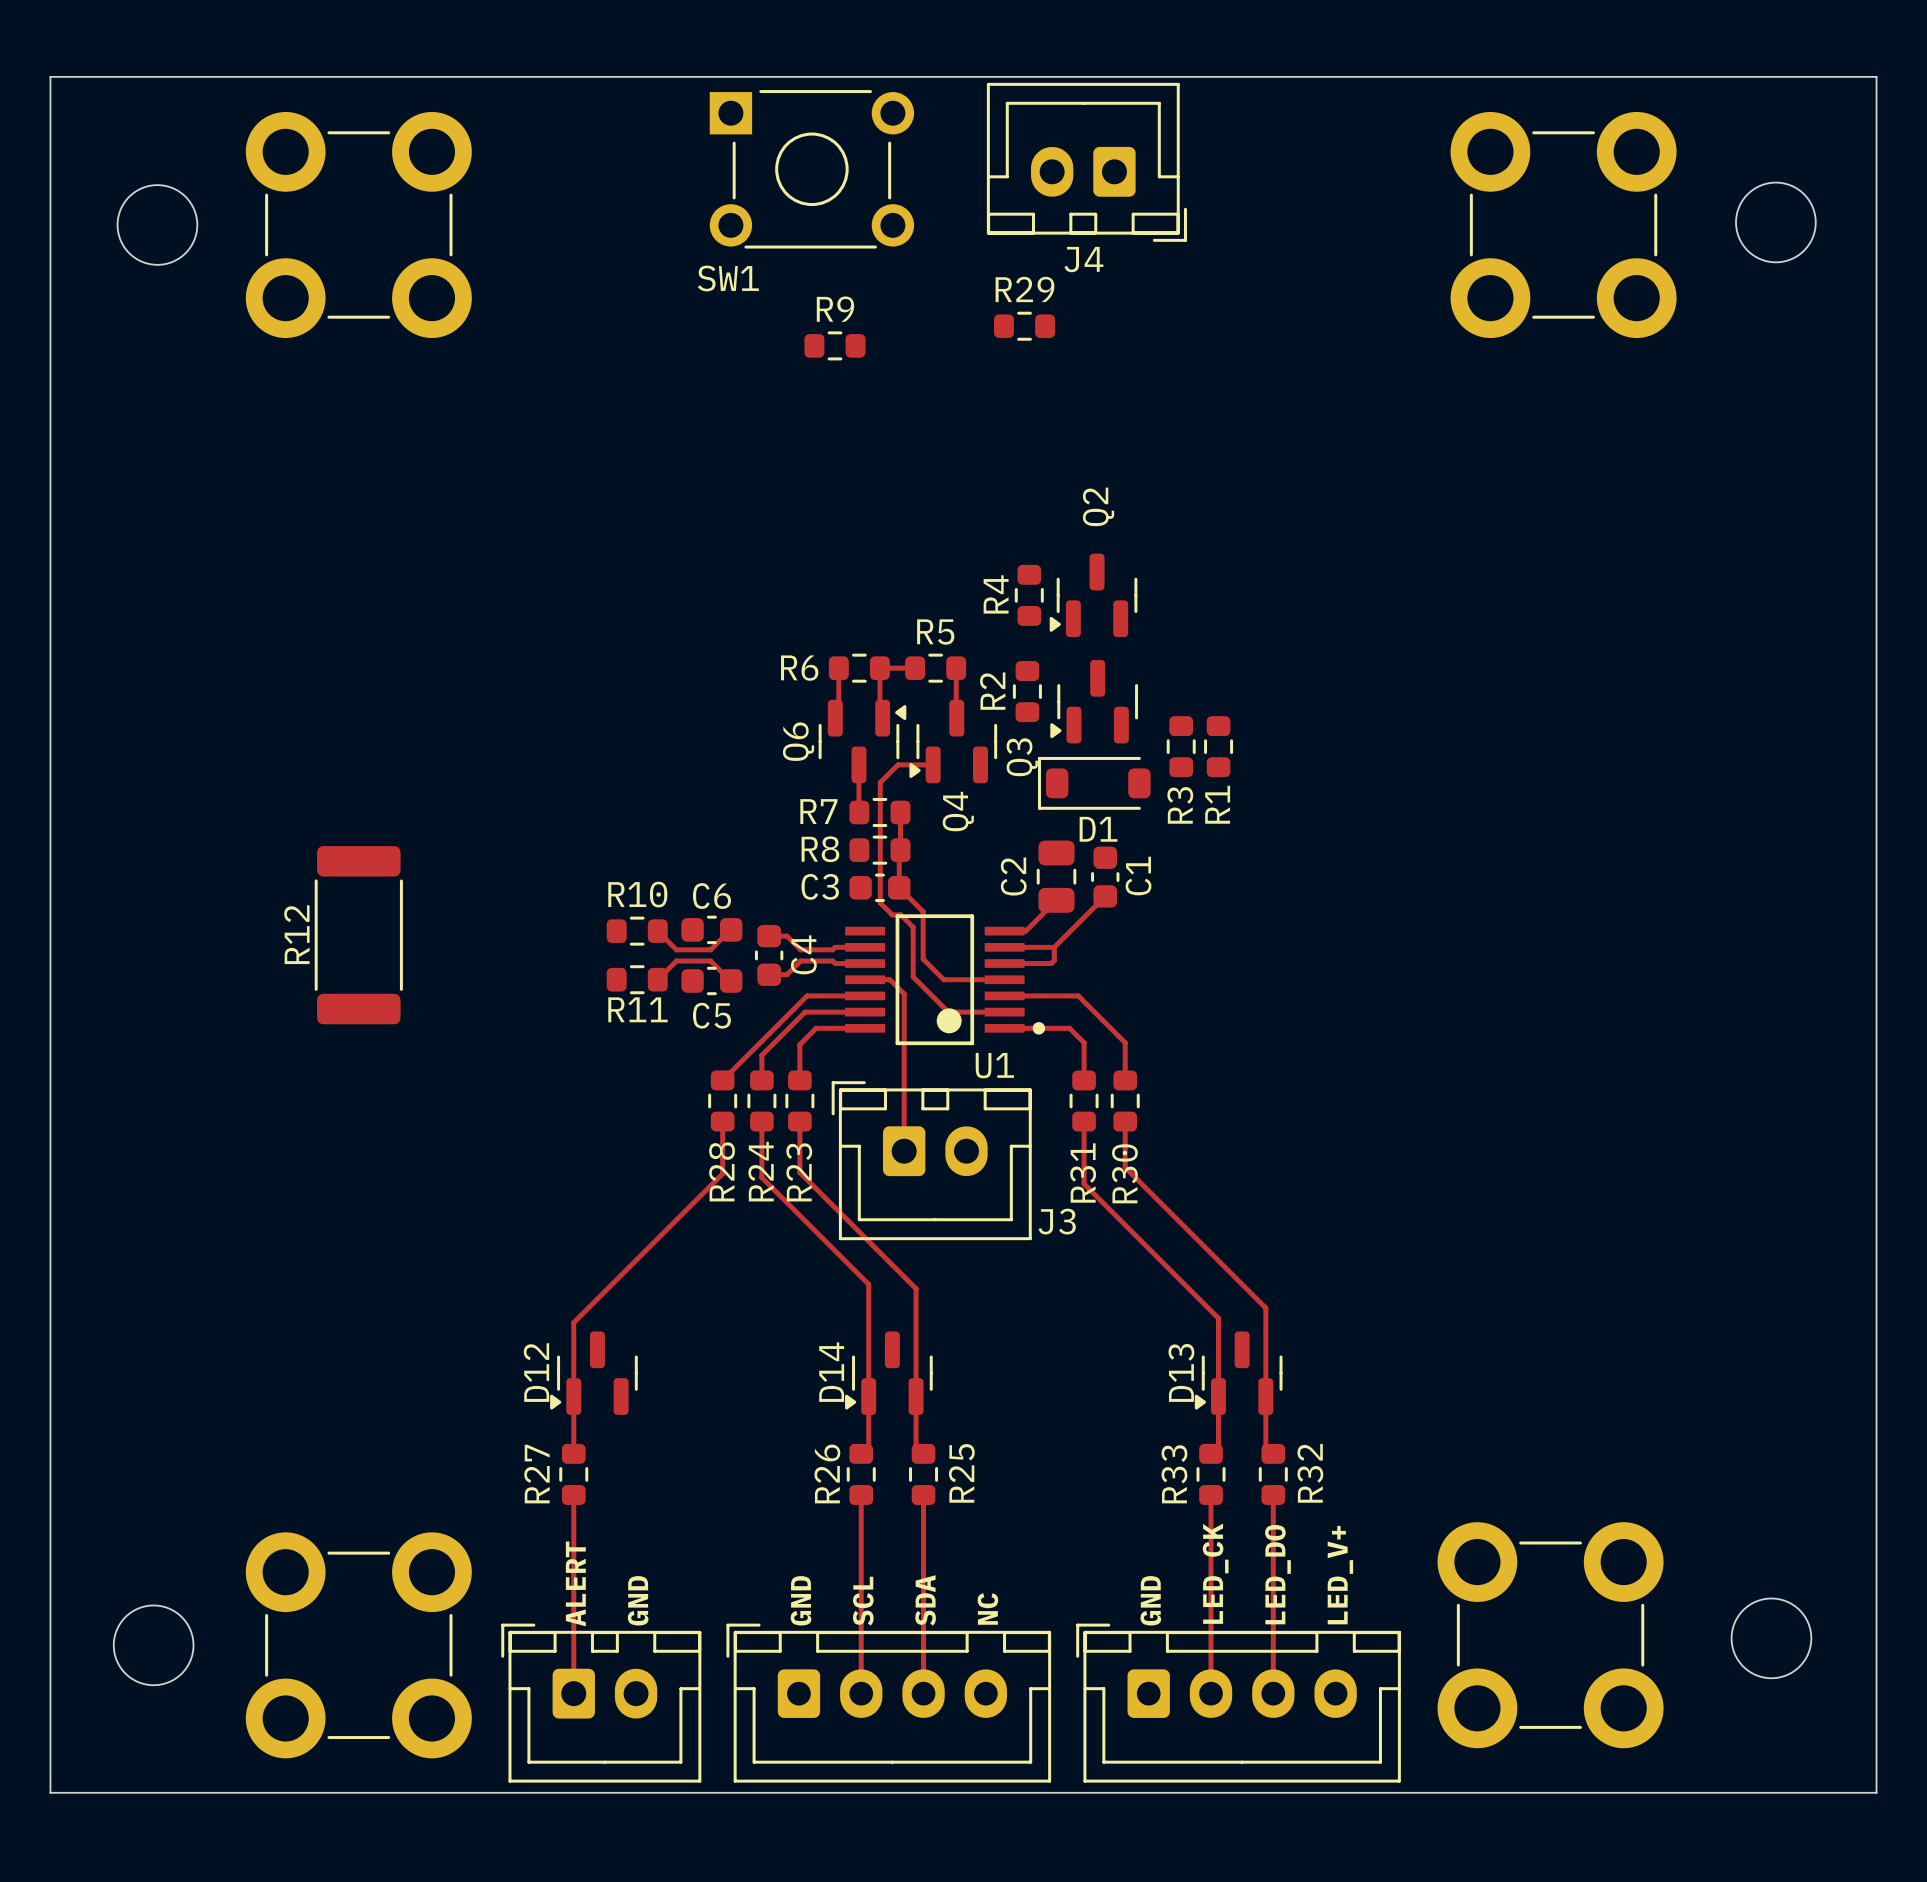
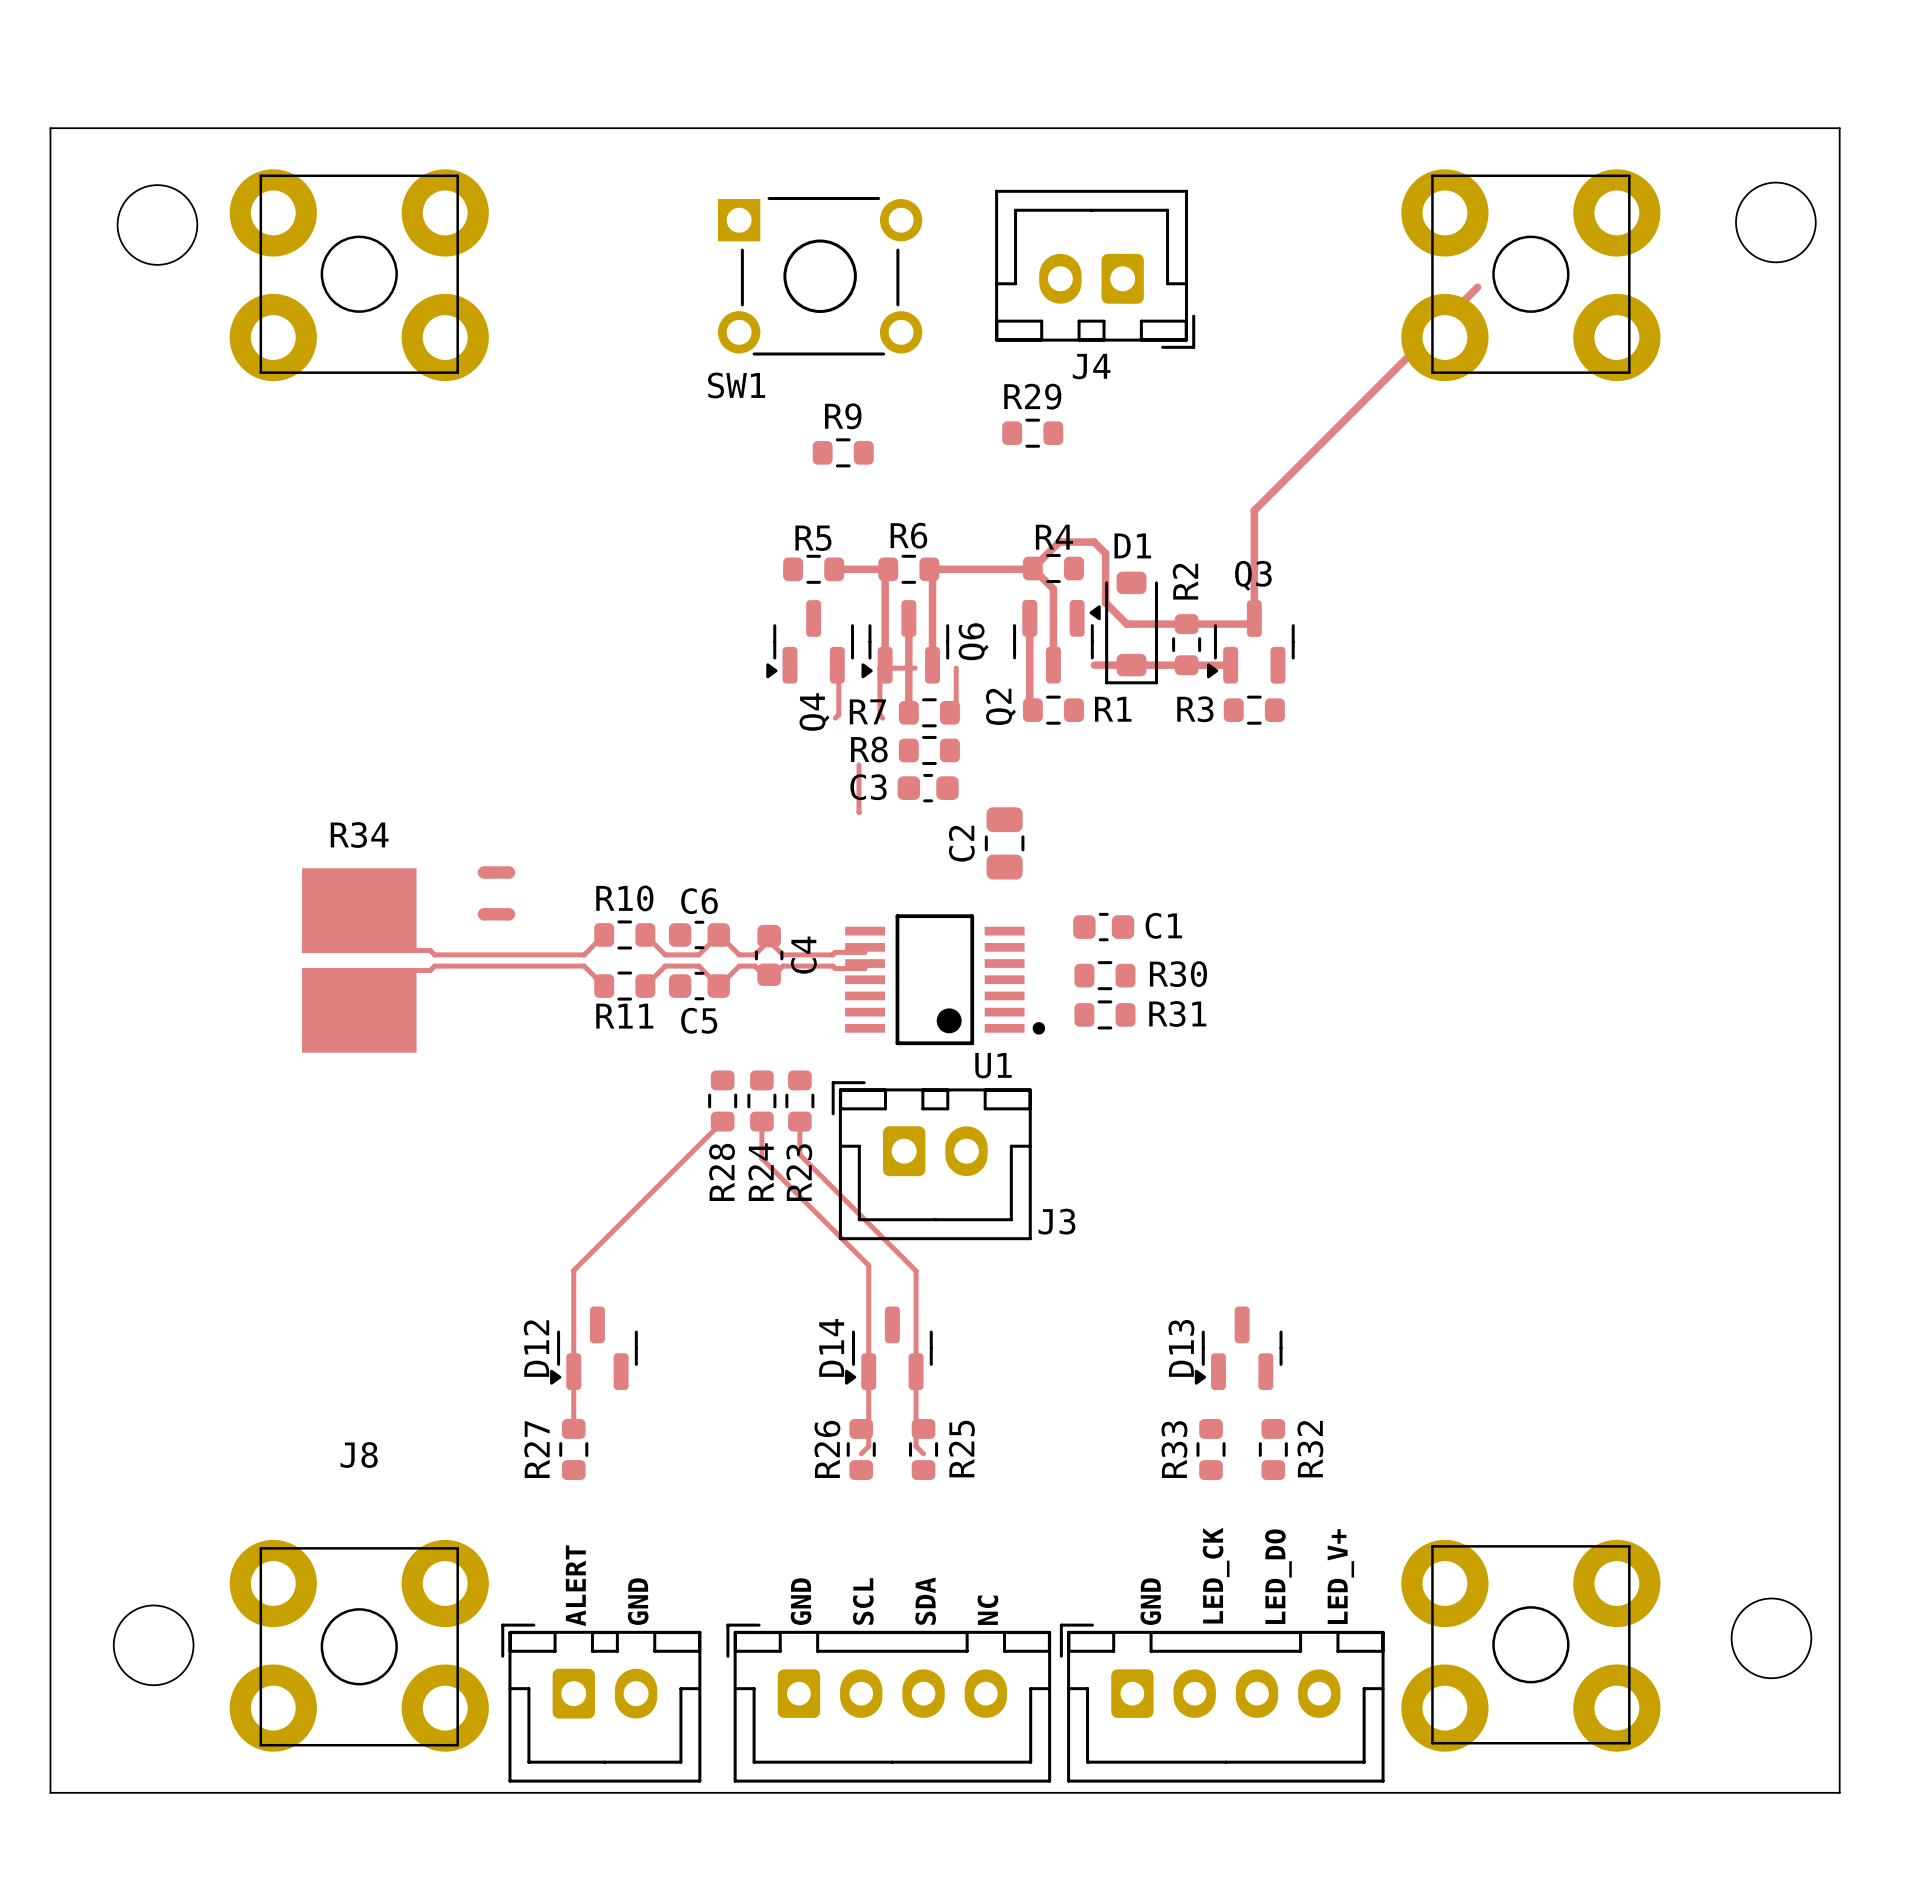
board edge: (50, 128) (50, 76) (1876, 76) (1876, 1792) (1839, 1792) -> (50, 128) (1839, 128) (1839, 1792)
J4 position: (1086, 162) -> (1095, 269)
SW1 position: (811, 169) -> (820, 276)
part: (358, 224) -> none
part: (1563, 224) -> none
part: none -> (359, 275)
part: none -> (1530, 275)
top track: none -> (1477, 287) (1254, 510) (1254, 618) (1248, 624) (1126, 624) (1105, 602) (1105, 553) (1094, 542) (1059, 542) (1032, 569) (929, 569) (932, 572) (932, 665)
R29 position: (1024, 326) -> (1032, 433)
R9 position: (835, 345) -> (843, 452)
Q2 name position: Q2 (1098, 506) -> Q2 (1000, 706)
top track: none -> (1032, 568) (1053, 589) (1053, 665)
top track: none -> (834, 569) (888, 569) (885, 572) (885, 665)
R4 rotation: 0° (1029, 595) -> 90° clockwise (1053, 568)
Q2 rotation: 0° (1093, 595) -> 180° (1056, 641)
Q2 position: (1093, 595) -> (1056, 641)
top track: none -> (908, 618) (908, 712)
top track: none -> (1029, 618) (1029, 707) (1032, 710)
R5 name position: R5 (935, 632) -> R5 (813, 538)
top track: none -> (1094, 665) (1230, 665)
R6 name position: R6 (799, 668) -> R6 (908, 535)
R6 position: (859, 668) -> (908, 569)
R5 position: (935, 668) -> (813, 569)
R2 name position: R2 (992, 691) -> R2 (1185, 581)
R2 position: (1027, 691) -> (1186, 644)
Q3 position: (1094, 701) -> (1250, 641)
Q6 rotation: 0° (862, 741) -> 180° (905, 641)
Q6 position: (862, 741) -> (905, 641)
Q4 position: (953, 741) -> (810, 641)
R3 rotation: 0° (1181, 746) -> 90° clockwise (1254, 710)
R3 position: (1181, 746) -> (1254, 710)
R1 rotation: 0° (1218, 746) -> 90° clockwise (1053, 710)
R1 position: (1218, 746) -> (1053, 710)
Q3 name rotation: 0° (1022, 757) -> 90° clockwise (1253, 575)
Q3 name position: Q3 (1022, 757) -> Q3 (1253, 575)
top track: (933, 764) (897, 764) (880, 782) (880, 902) (892, 914) (900, 914) (913, 927) (913, 976) (948, 1012) (1004, 1012) -> none
D1 rotation: 0° (1094, 783) -> 90° counterclockwise (1131, 627)
D1 position: (1094, 783) -> (1131, 627)
R1 name position: R1 (1217, 804) -> R1 (1113, 709)
R7 position: (879, 812) -> (929, 712)
top track: (900, 812) (899, 887) (923, 911) (923, 959) (943, 979) (1004, 979) -> none
D1 name position: D1 (1098, 829) -> D1 (1132, 545)
R8 position: (879, 850) -> (929, 750)
part: none -> (496, 872)
C2 position: (1056, 876) -> (1004, 843)
C1 rotation: 0° (1105, 877) -> 90° clockwise (1103, 927)
C1 position: (1105, 877) -> (1103, 927)
C3 position: (879, 887) -> (928, 788)
top track: (1105, 896) (1054, 947) -> none
top track: (1056, 900) (1025, 931) (1004, 931) -> none
part: none -> (496, 914)
C6 position: (711, 929) -> (699, 934)
top track: (731, 929) (710, 949) (676, 949) (657, 931) -> none
R10 position: (637, 931) -> (624, 934)
top track: none -> (604, 934) (584, 954) (434, 954) (430, 950) (426, 950)
top track: none -> (645, 934) (665, 954) (698, 954) (718, 934) (739, 954) (754, 954) (768, 941) (782, 954) (832, 954) (835, 952) (865, 952)
R12: (358, 935) -> none
top track: (769, 936) (786, 936) (800, 949) (865, 947) -> none
top track: (1004, 947) (1054, 947) -> none
top track: (1054, 947) (1054, 960) (1051, 963) (1004, 963) -> none
drawing: none -> [414, 948, 428, 973]
R34: none -> (365, 960)
top track: (865, 963) (800, 961) (786, 974) (769, 974) -> none
top track: none -> (865, 968) (835, 968) (832, 966) (782, 966) (768, 979) (754, 966) (739, 966) (718, 986) (698, 966) (665, 966) (645, 986)
top track: none -> (426, 970) (430, 970) (434, 966) (584, 966) (604, 986)
R11 position: (637, 979) -> (624, 986)
top track: (657, 979) (676, 961) (710, 961) (731, 980) -> none
top track: (865, 979) (889, 979) (904, 993) (904, 1151) -> none
C5 position: (711, 980) -> (699, 986)
top track: (865, 995) (807, 995) (722, 1080) -> none
top track: (1004, 995) (1078, 995) (1125, 1042) (1125, 1080) -> none
top track: (865, 1012) (805, 1012) (761, 1055) (761, 1080) -> none
top track: (865, 1028) (816, 1028) (799, 1044) (799, 1080) -> none
top track: (1004, 1028) (1069, 1028) (1084, 1042) (1084, 1080) -> none
R31 rotation: 0° (1084, 1100) -> 90° clockwise (1104, 1014)
R31 position: (1084, 1100) -> (1104, 1014)
R30 rotation: 0° (1125, 1100) -> 90° clockwise (1104, 975)
R30 position: (1125, 1100) -> (1104, 975)
top track: (722, 1121) (722, 1173) (573, 1322) -> (722, 1121) (573, 1270) (573, 1322)
top track: (1084, 1121) (1084, 1183) (1218, 1318) (1218, 1446) (1211, 1453) -> none
top track: (1125, 1121) (1125, 1167) (1265, 1308) (1265, 1446) (1273, 1453) -> none
top track: (799, 1154) (799, 1172) (916, 1288) -> (799, 1154) (916, 1270) (916, 1288)
top track: (761, 1158) (761, 1177) (868, 1284) -> (761, 1158) (868, 1265) (868, 1284)
R31 name position: R31 (1083, 1173) -> R31 (1177, 1014)
R30 name position: R30 (1124, 1173) -> R30 (1178, 974)
D12 position: (593, 1373) -> (593, 1348)
D14 position: (888, 1373) -> (888, 1348)
D13 position: (1238, 1373) -> (1238, 1348)
top track: (573, 1428) (573, 1453) -> none
R27 position: (573, 1474) -> (573, 1449)
R26 position: (861, 1474) -> (861, 1449)
R25 position: (923, 1474) -> (923, 1449)
R33 position: (1211, 1474) -> (1211, 1449)
R32 position: (1273, 1474) -> (1273, 1449)
top track: (573, 1494) (573, 1693) -> none
top track: (861, 1494) (861, 1693) -> none
top track: (923, 1494) (923, 1693) -> none
top track: (1211, 1494) (1211, 1693) -> none
top track: (1273, 1494) (1273, 1693) -> none
part footprint: [1437, 1522, 1664, 1749] -> [1401, 1539, 1661, 1752]
part: (358, 1645) -> none
J8: none -> (359, 1645)
part position: (1238, 1703) -> (1222, 1703)

